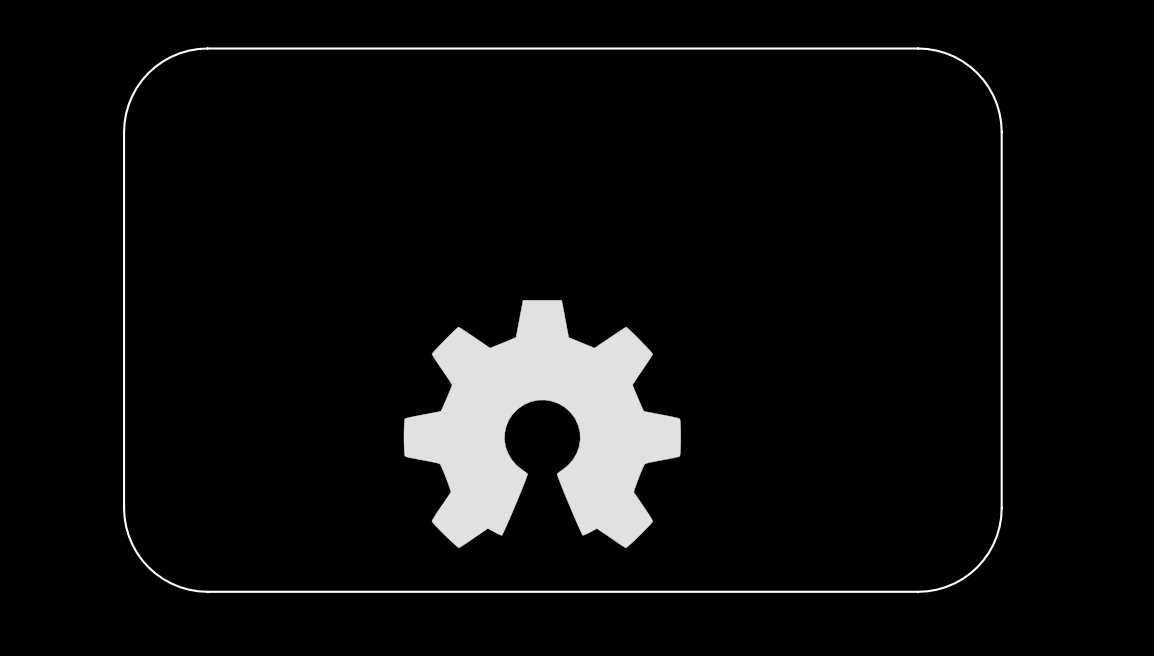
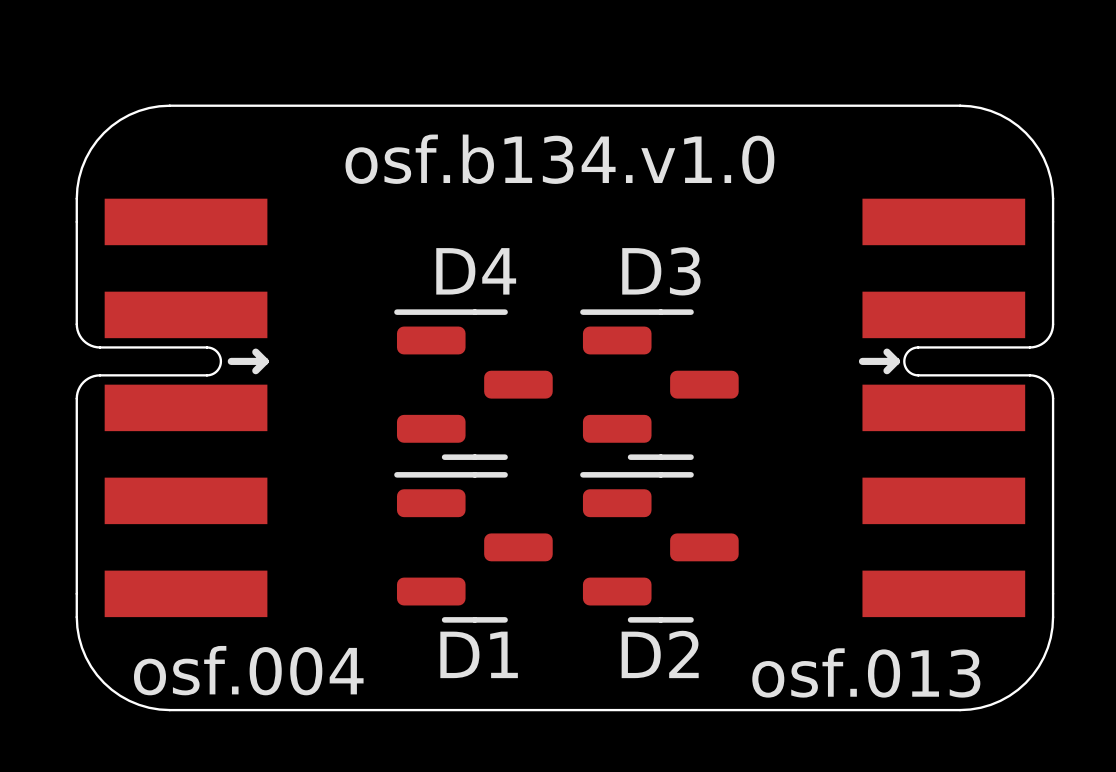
text: none -> osf.b134.v1.0 (559, 159)
board edge: (124, 152) (124, 487) -> none
board edge: (1001, 152) (1001, 487) -> none
D4: none -> (473, 384)
D3: none -> (659, 384)
drawing: [403, 300, 681, 549] -> none
part: none -> (172, 407)
part: none -> (956, 407)
D1: none -> (473, 547)
D2: none -> (659, 547)
text: none -> osf.004 (248, 670)
text: none -> osf.013 (866, 672)

